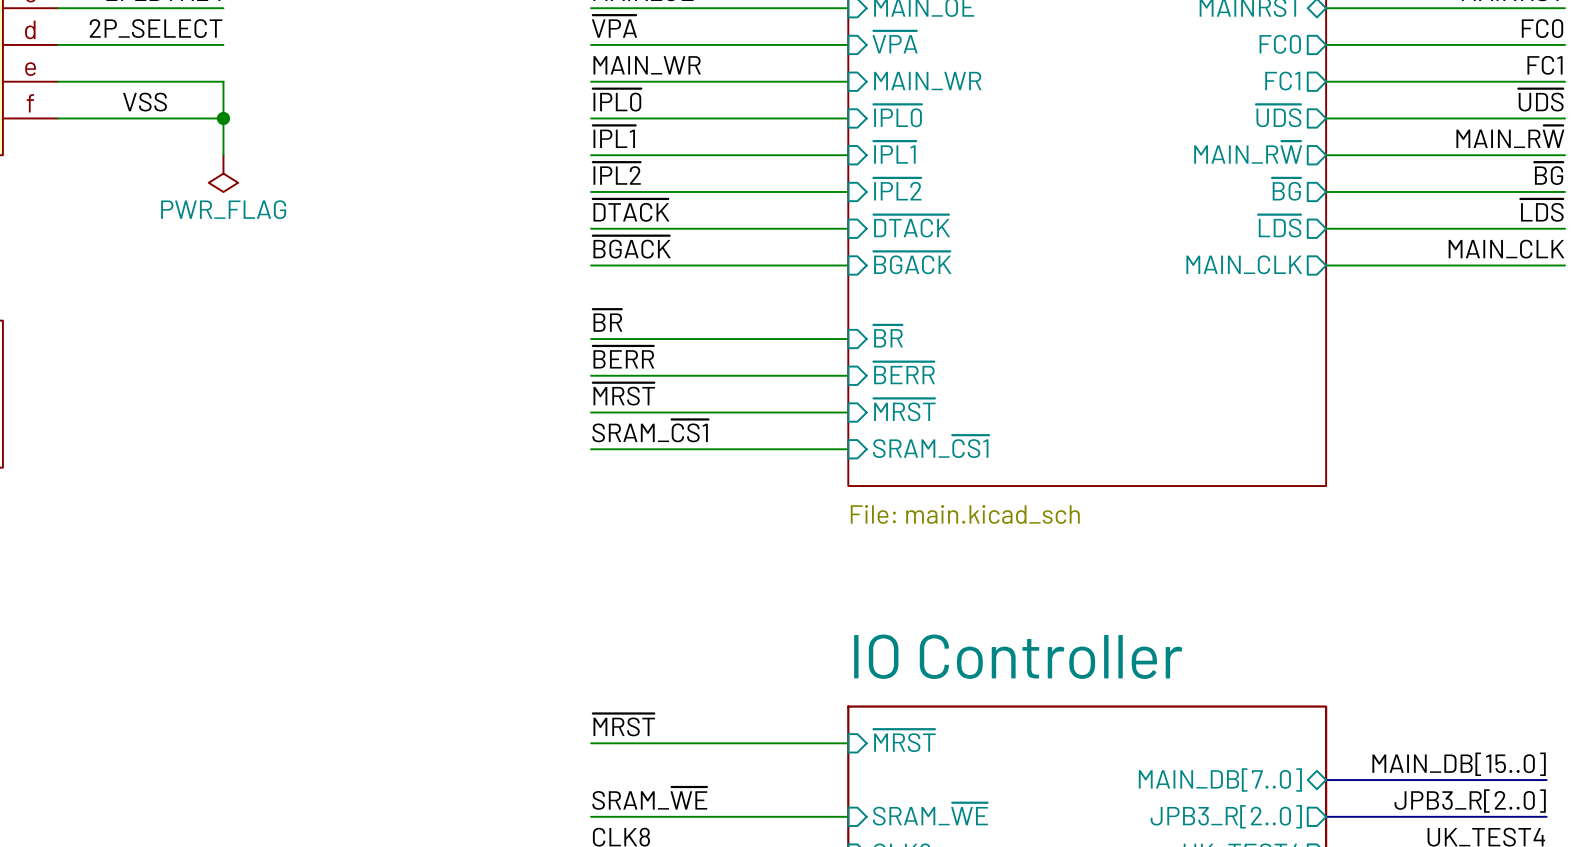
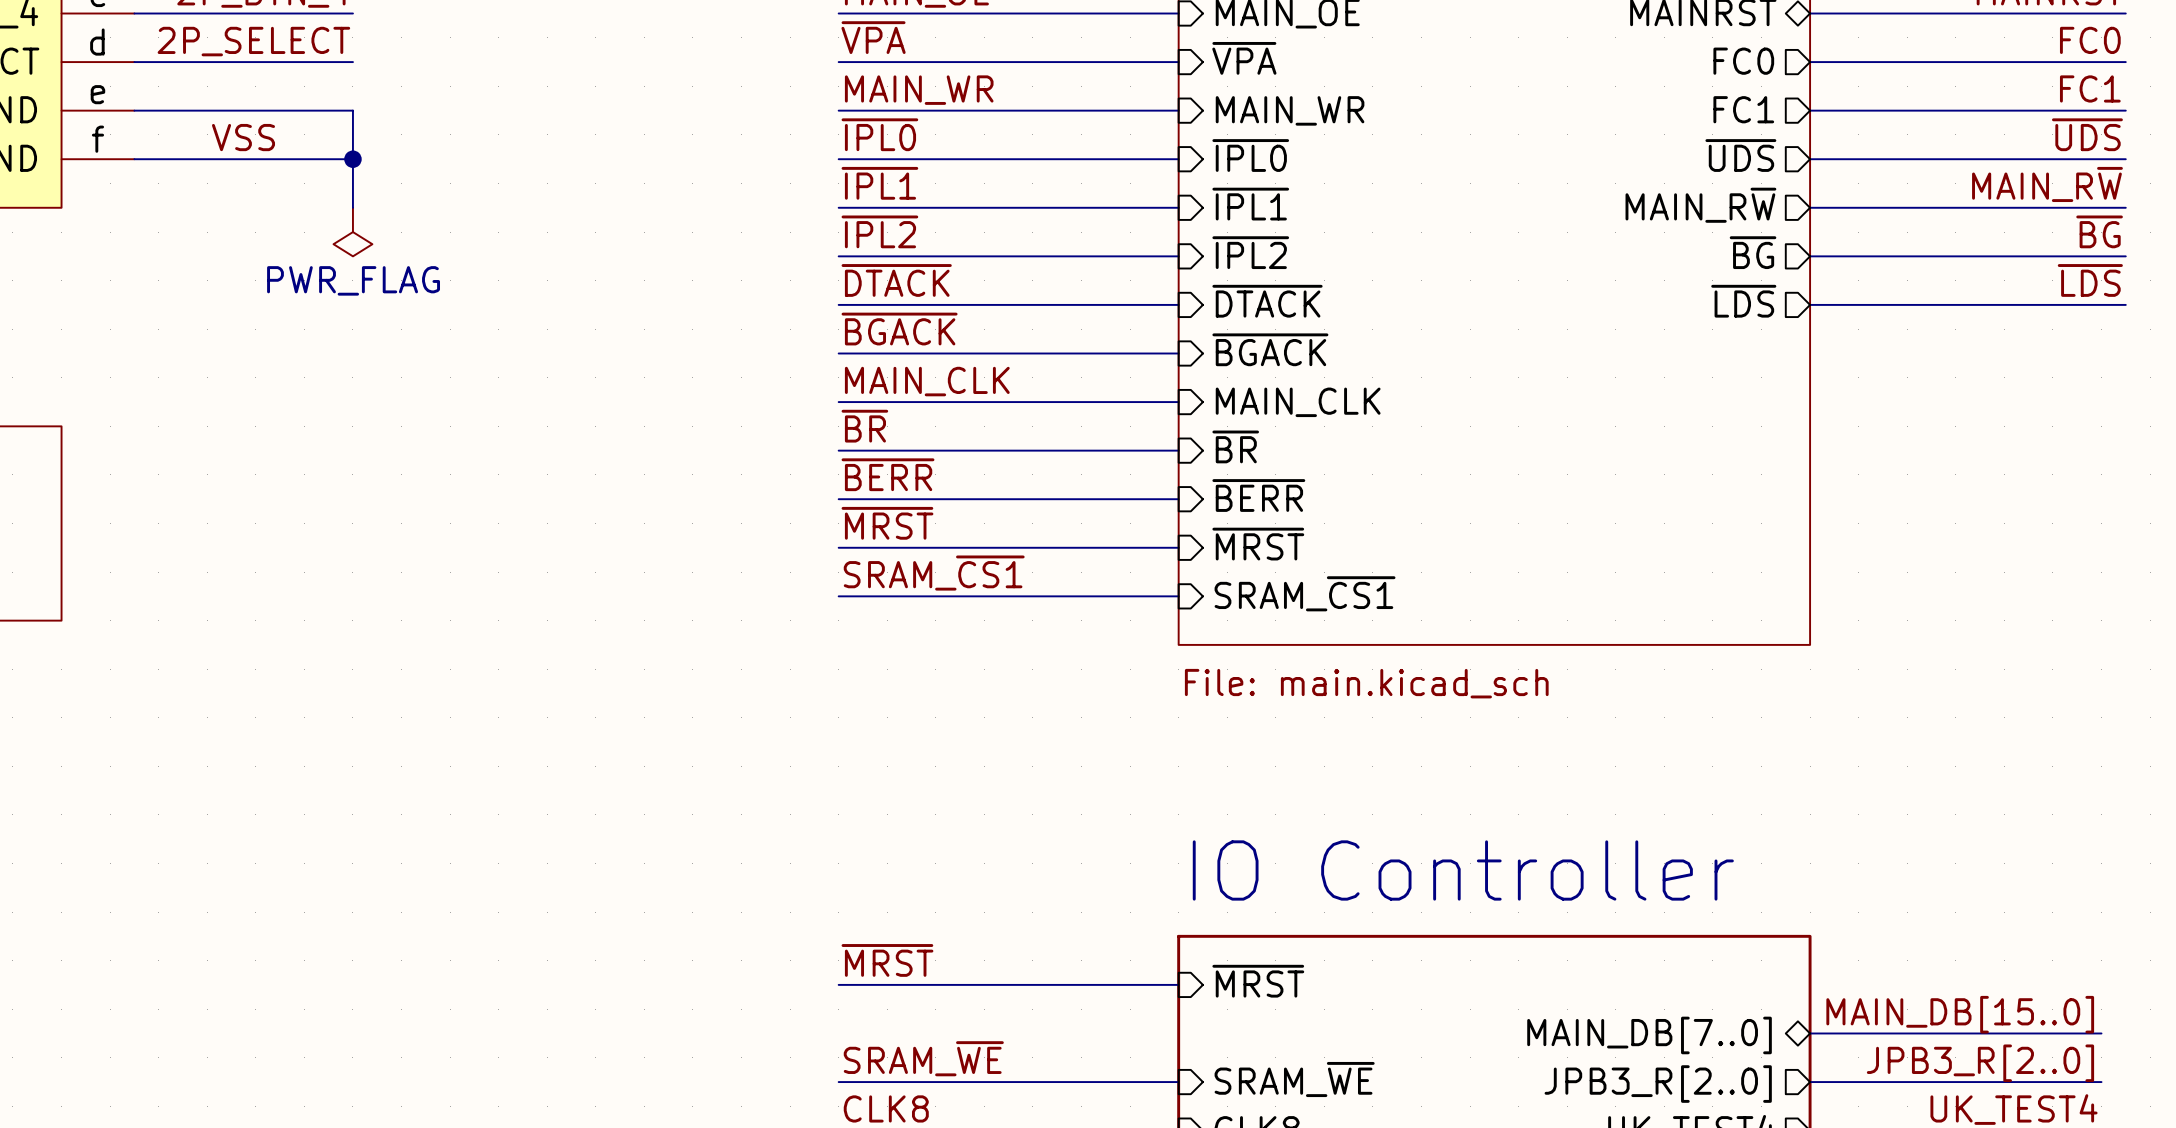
label: MAIN_CLK (1506, 249) -> none
sheet pin: MAIN_CLK (1244, 264) -> none
wire: (1326, 265) (1565, 265) -> none
label: none -> MAIN_CLK (927, 381)
sheet pin: none -> MAIN_CLK (1298, 402)
wire: none -> (838, 402) (1178, 402)

